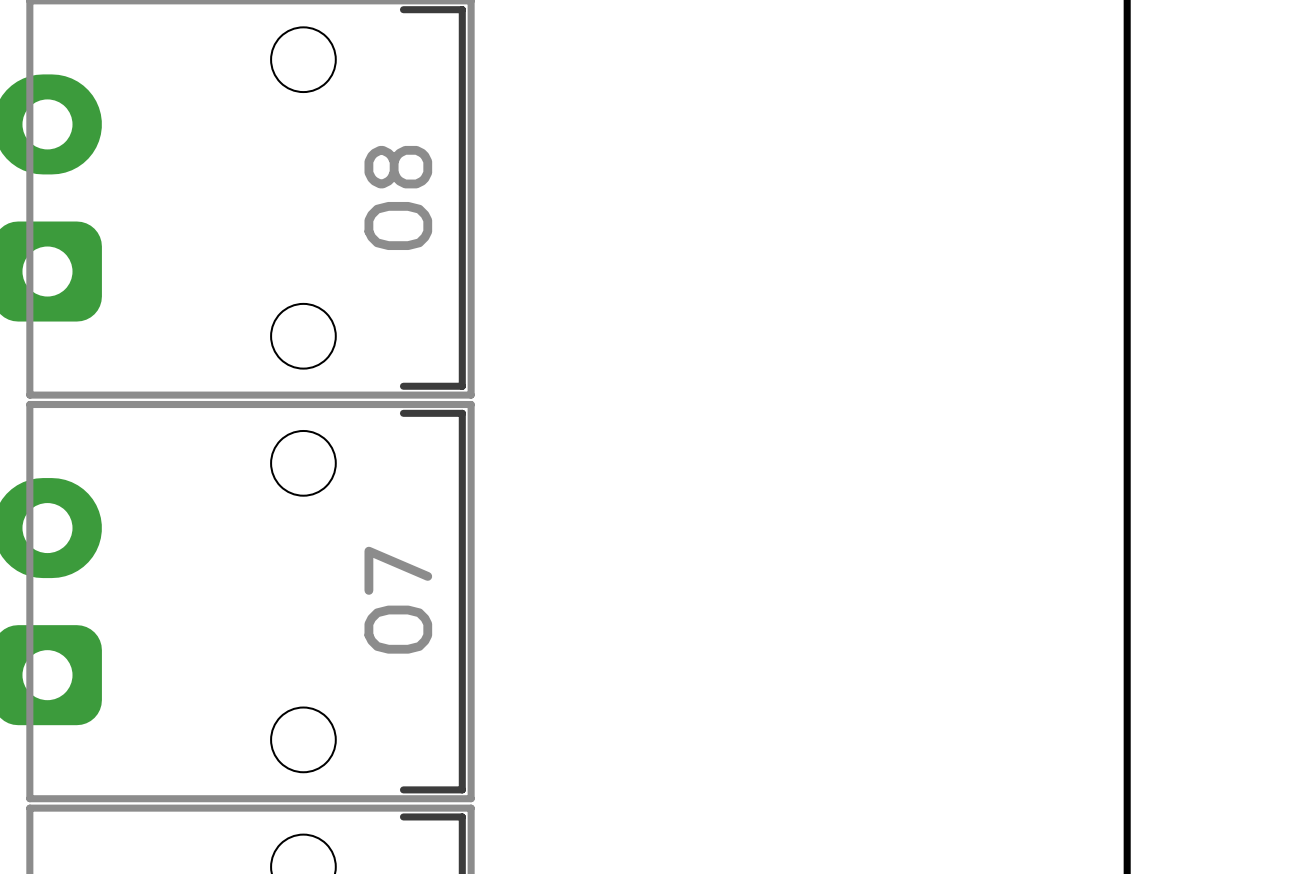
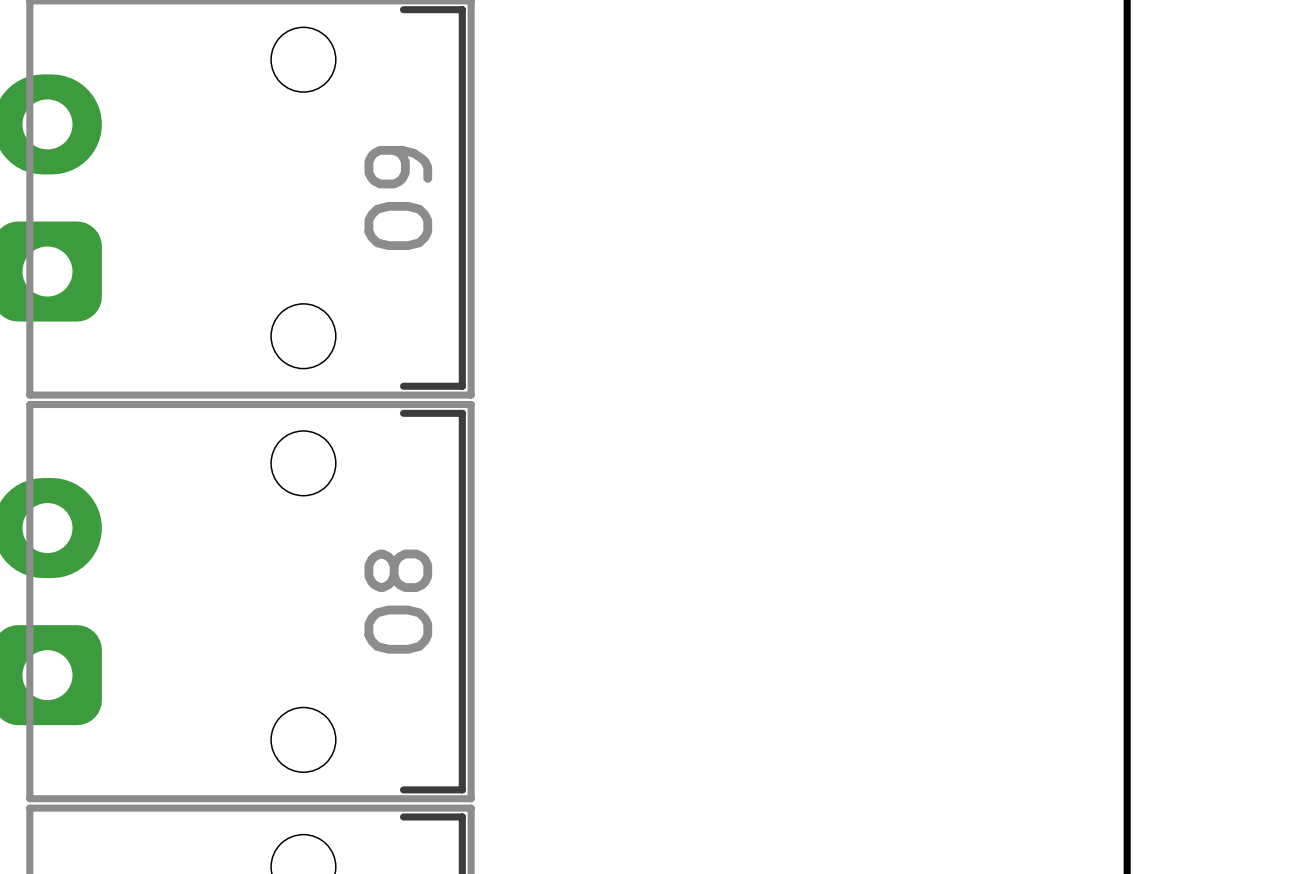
part value: O8 (398, 197) -> O9 (398, 197)
part value: O7 (398, 600) -> O8 (398, 601)

